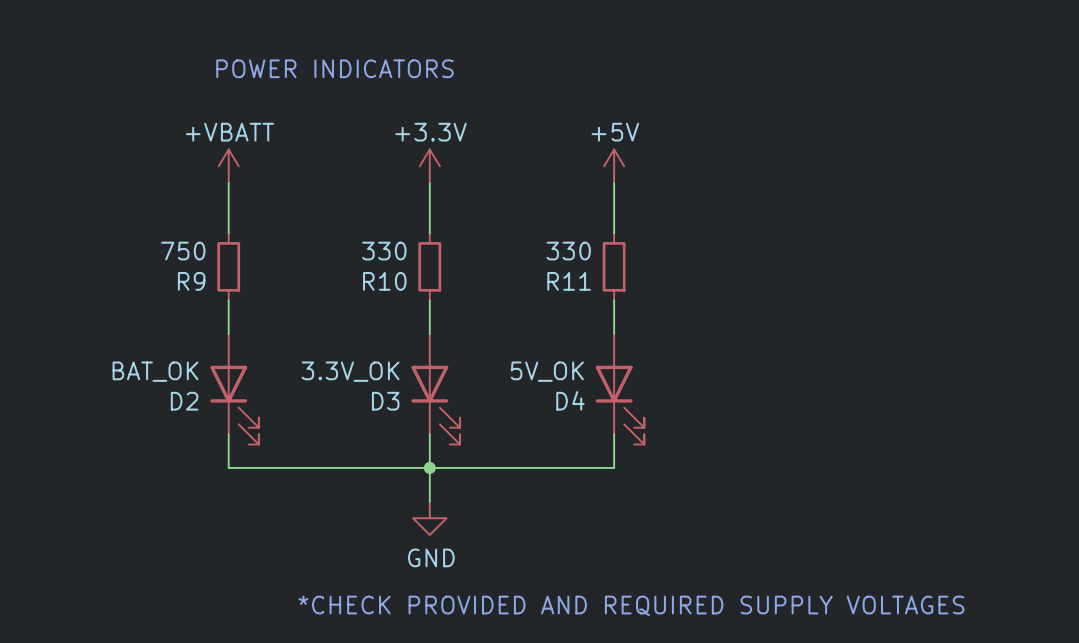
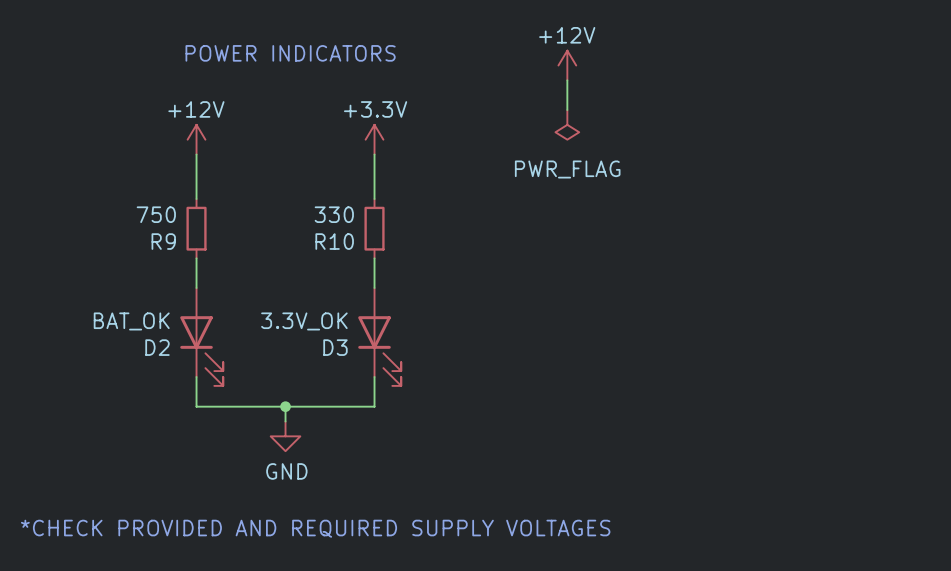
power symbol: none -> +12V (567, 65)
power symbol: none -> PWR_FLAG (567, 124)
power symbol: +VBATT (228, 166) -> +12V (196, 139)
power symbol: +5V (614, 166) -> none
wire: (614, 183) (614, 233) -> none
R11: 330 (614, 266) -> none
wire: (614, 300) (614, 333) -> (567, 80) (567, 110)
D4: 5V_OK (620, 389) -> none
wire: (614, 434) (614, 467) (429, 467) (429, 501) -> none
wire: none -> (285, 406) (285, 421)
junction: none -> (285, 406)
junction: (429, 467) -> none
power symbol position: GND (429, 518) -> GND (285, 436)
text position: *CHECK PROVIDED AND REQUIRED SUPPLY VOLTAGES (631, 605) -> *CHECK PROVIDED AND REQUIRED SUPPLY VOLTAGES (315, 528)

